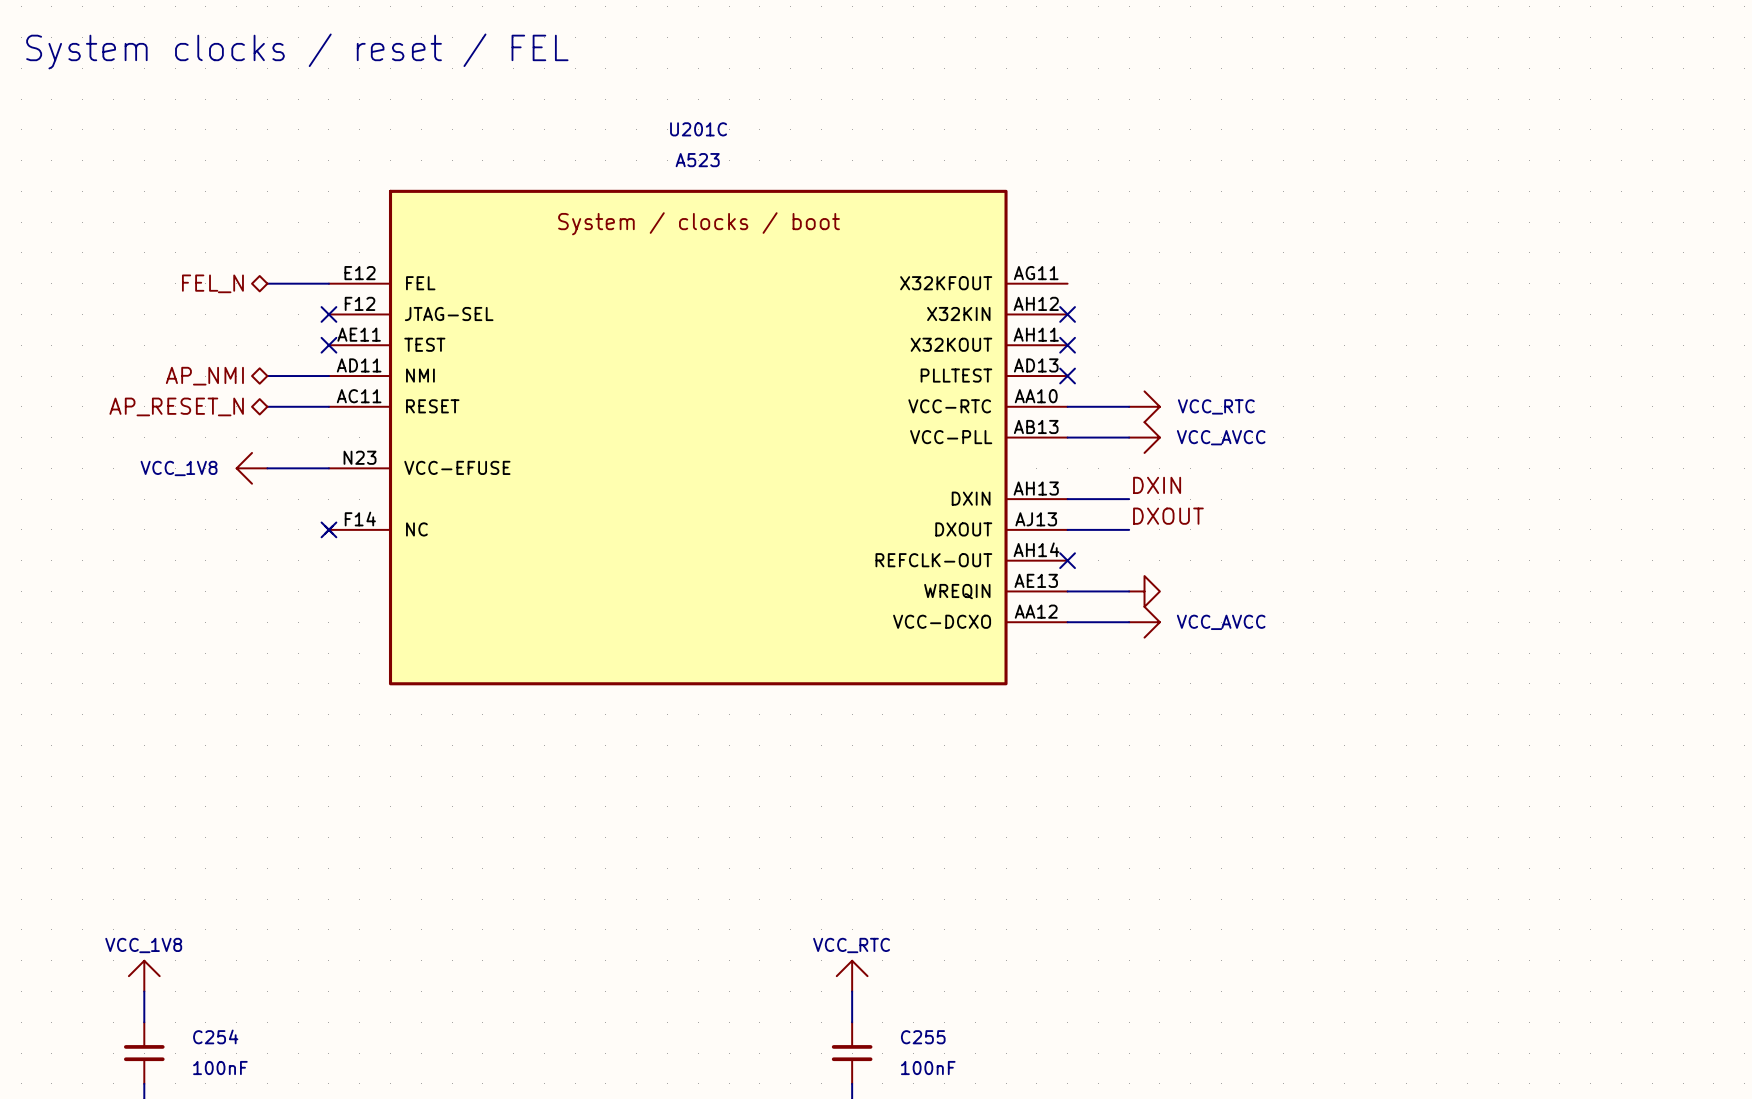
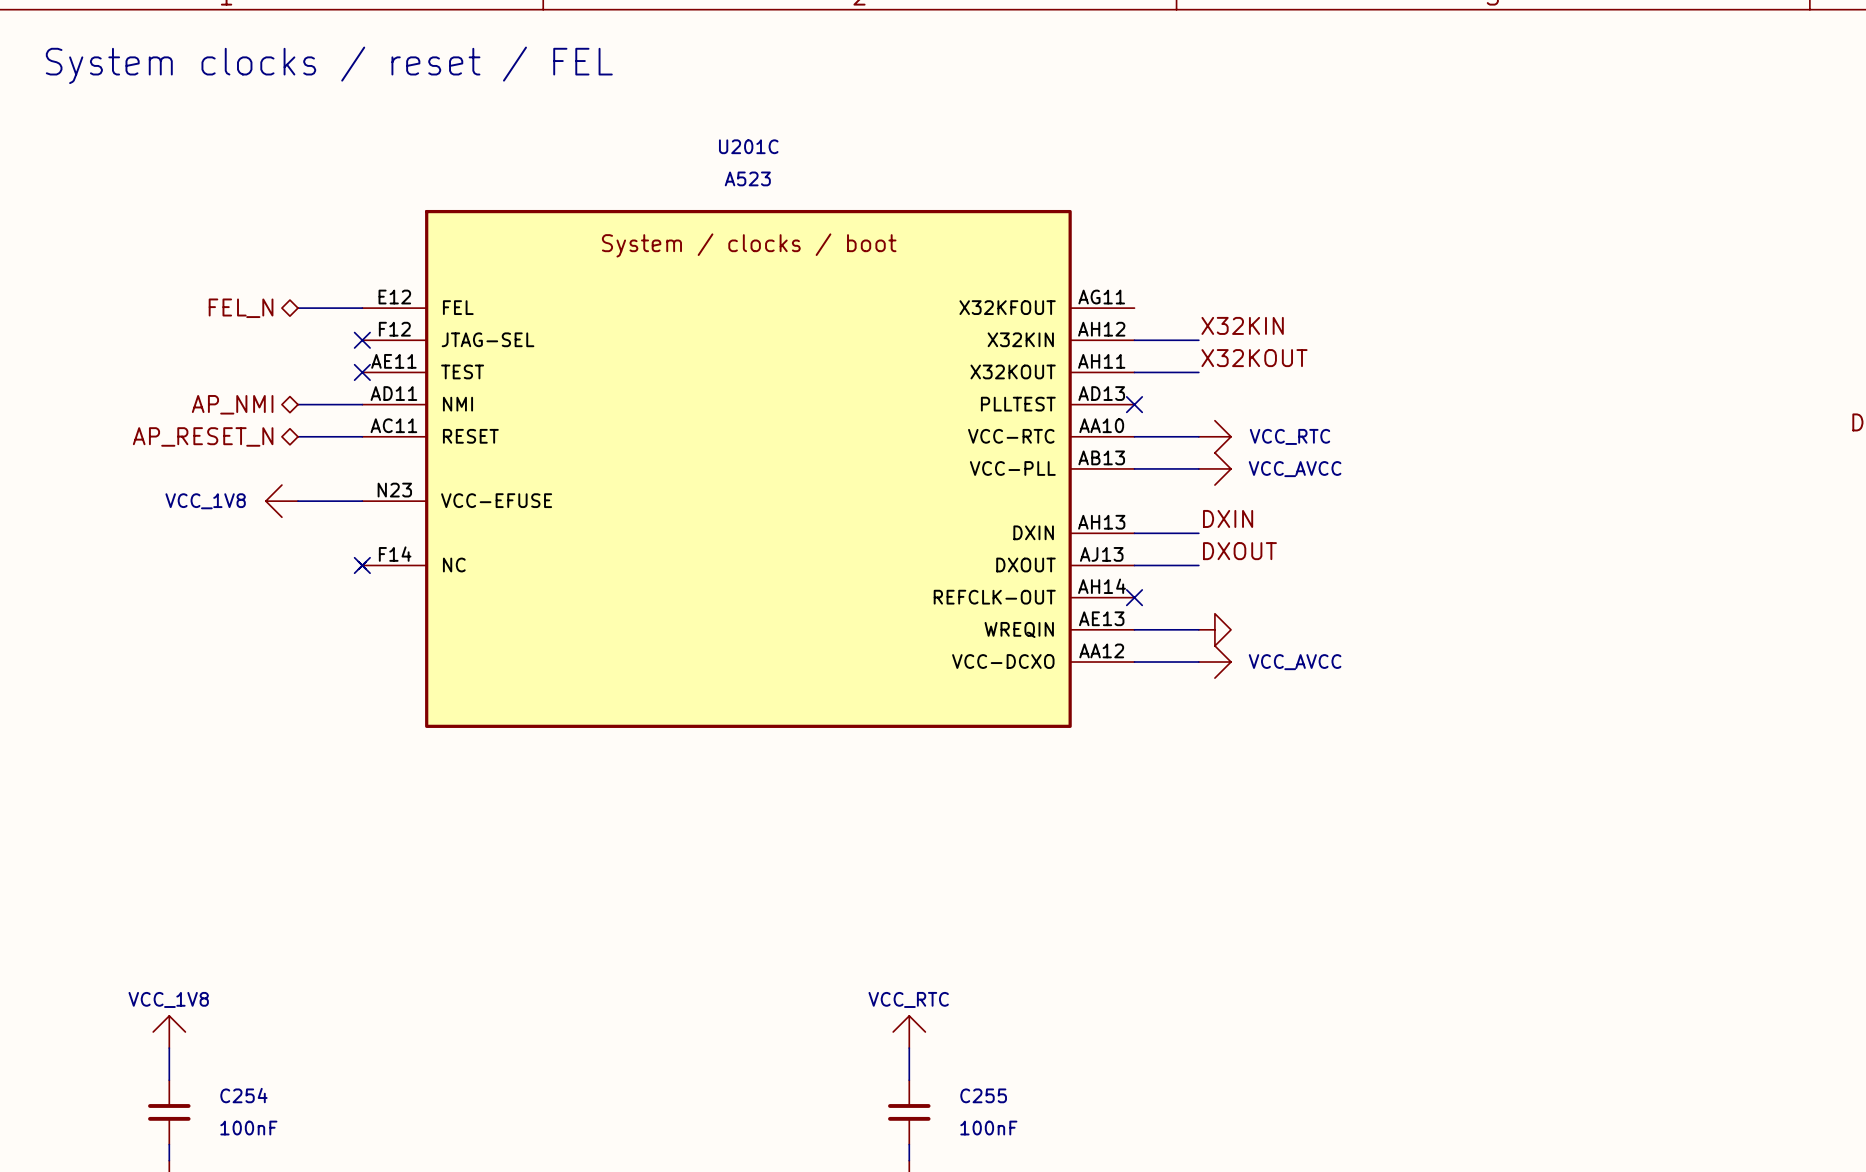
label: none -> X32KIN (1242, 325)
wire: none -> (1134, 340) (1198, 340)
no-connect mark: (1067, 314) -> none
label: none -> X32KOUT (1254, 358)
wire: none -> (1134, 372) (1198, 372)
no-connect mark: (1067, 345) -> none

